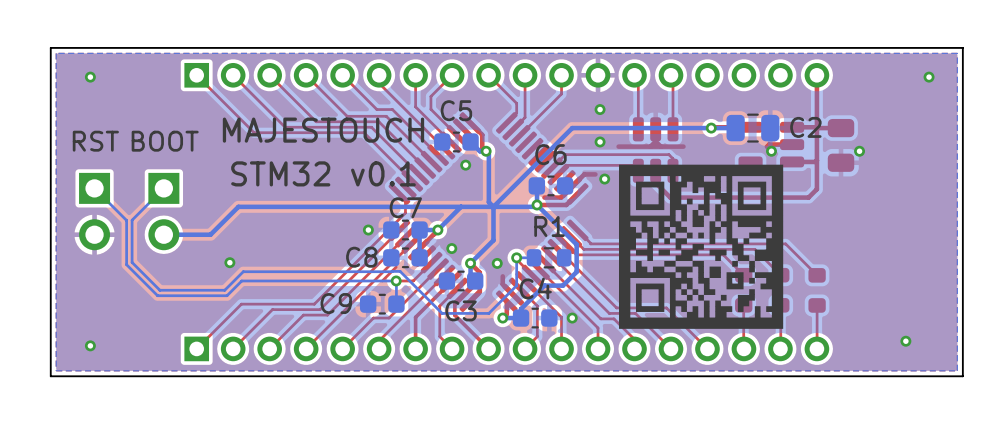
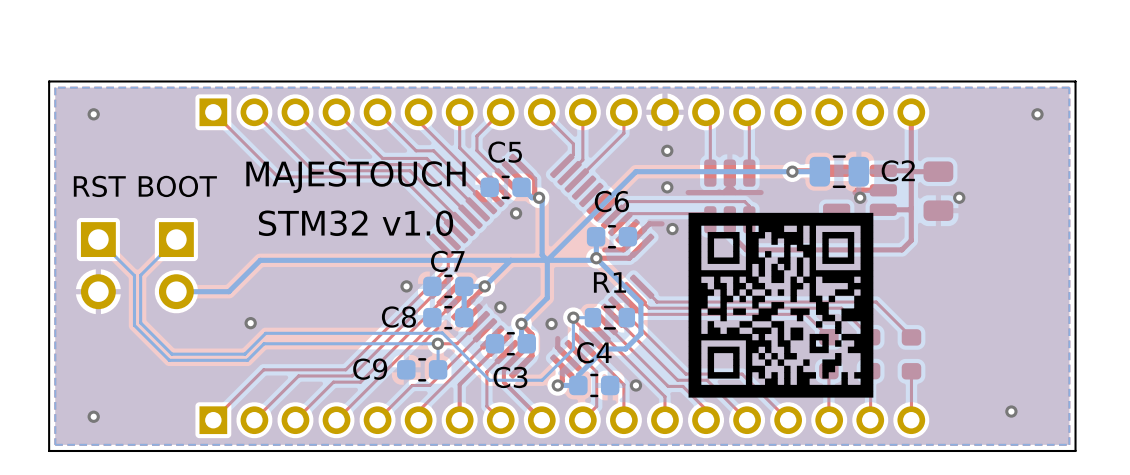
text: STM32 v0.1 (323, 173) -> STM32 v1.0 (356, 223)

